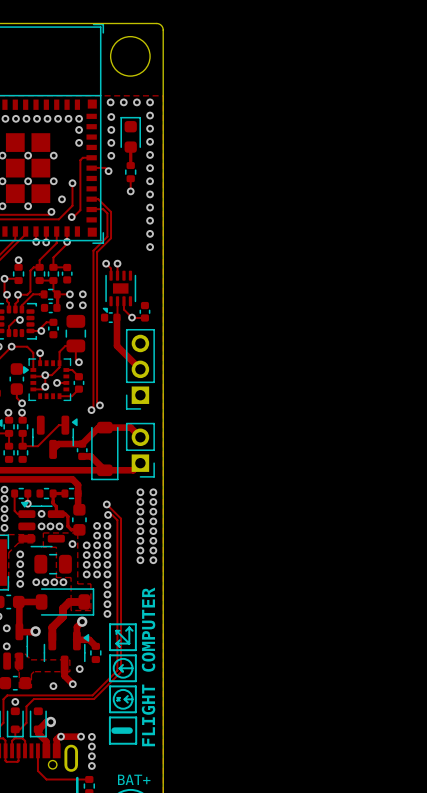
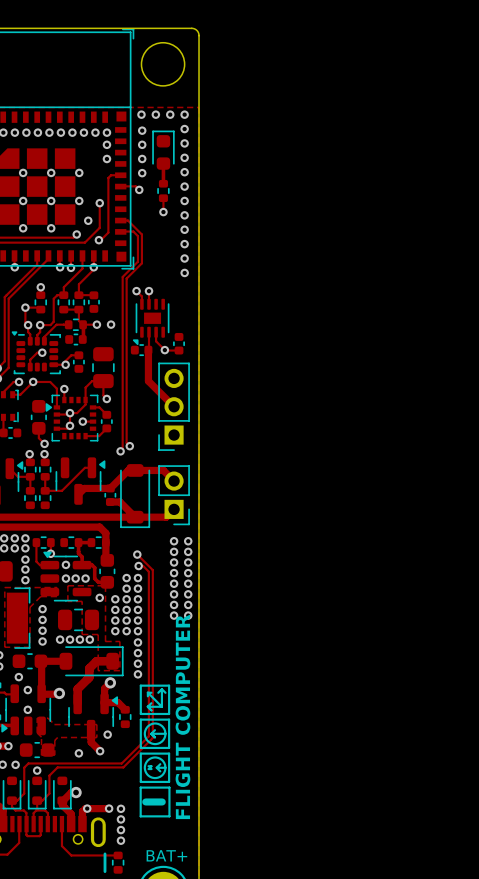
via: (69, 305) -> none
via: (82, 305) -> none

